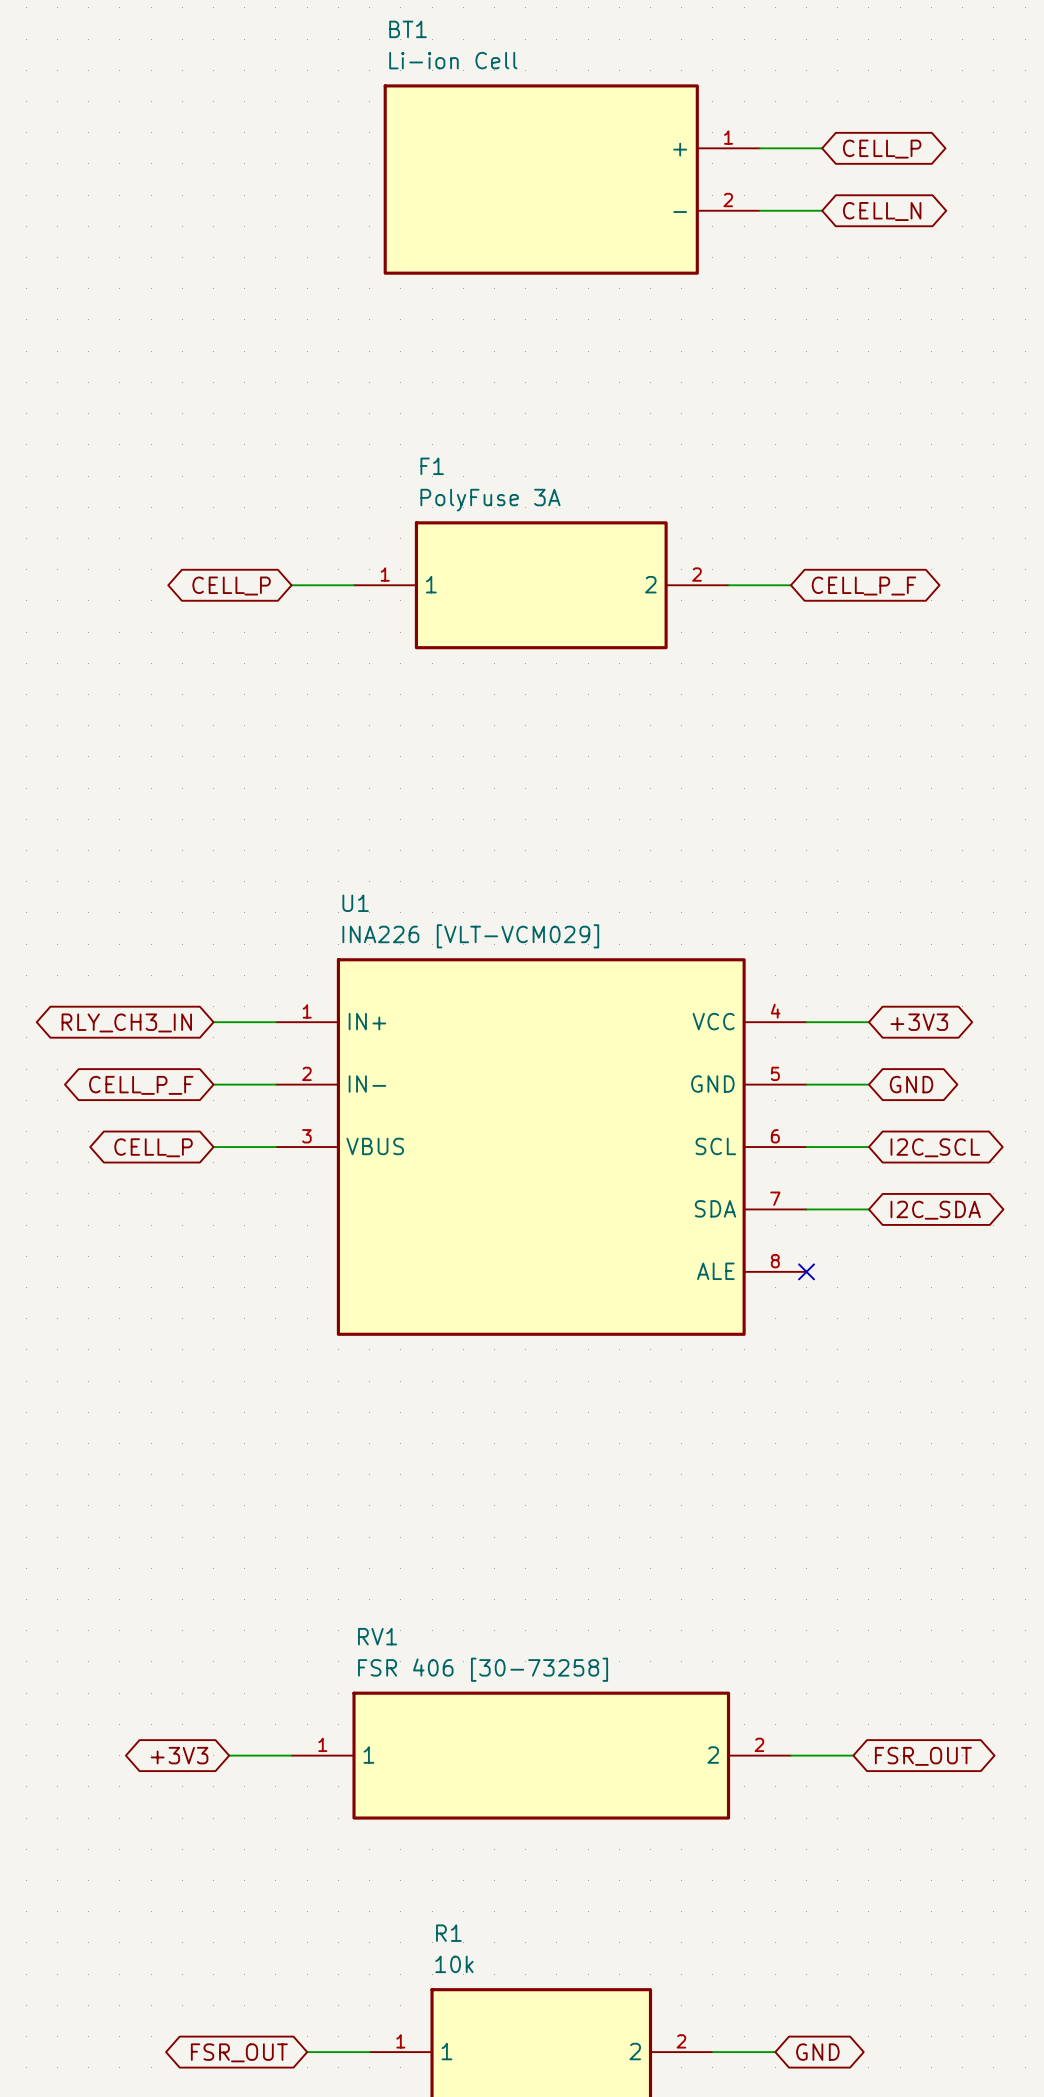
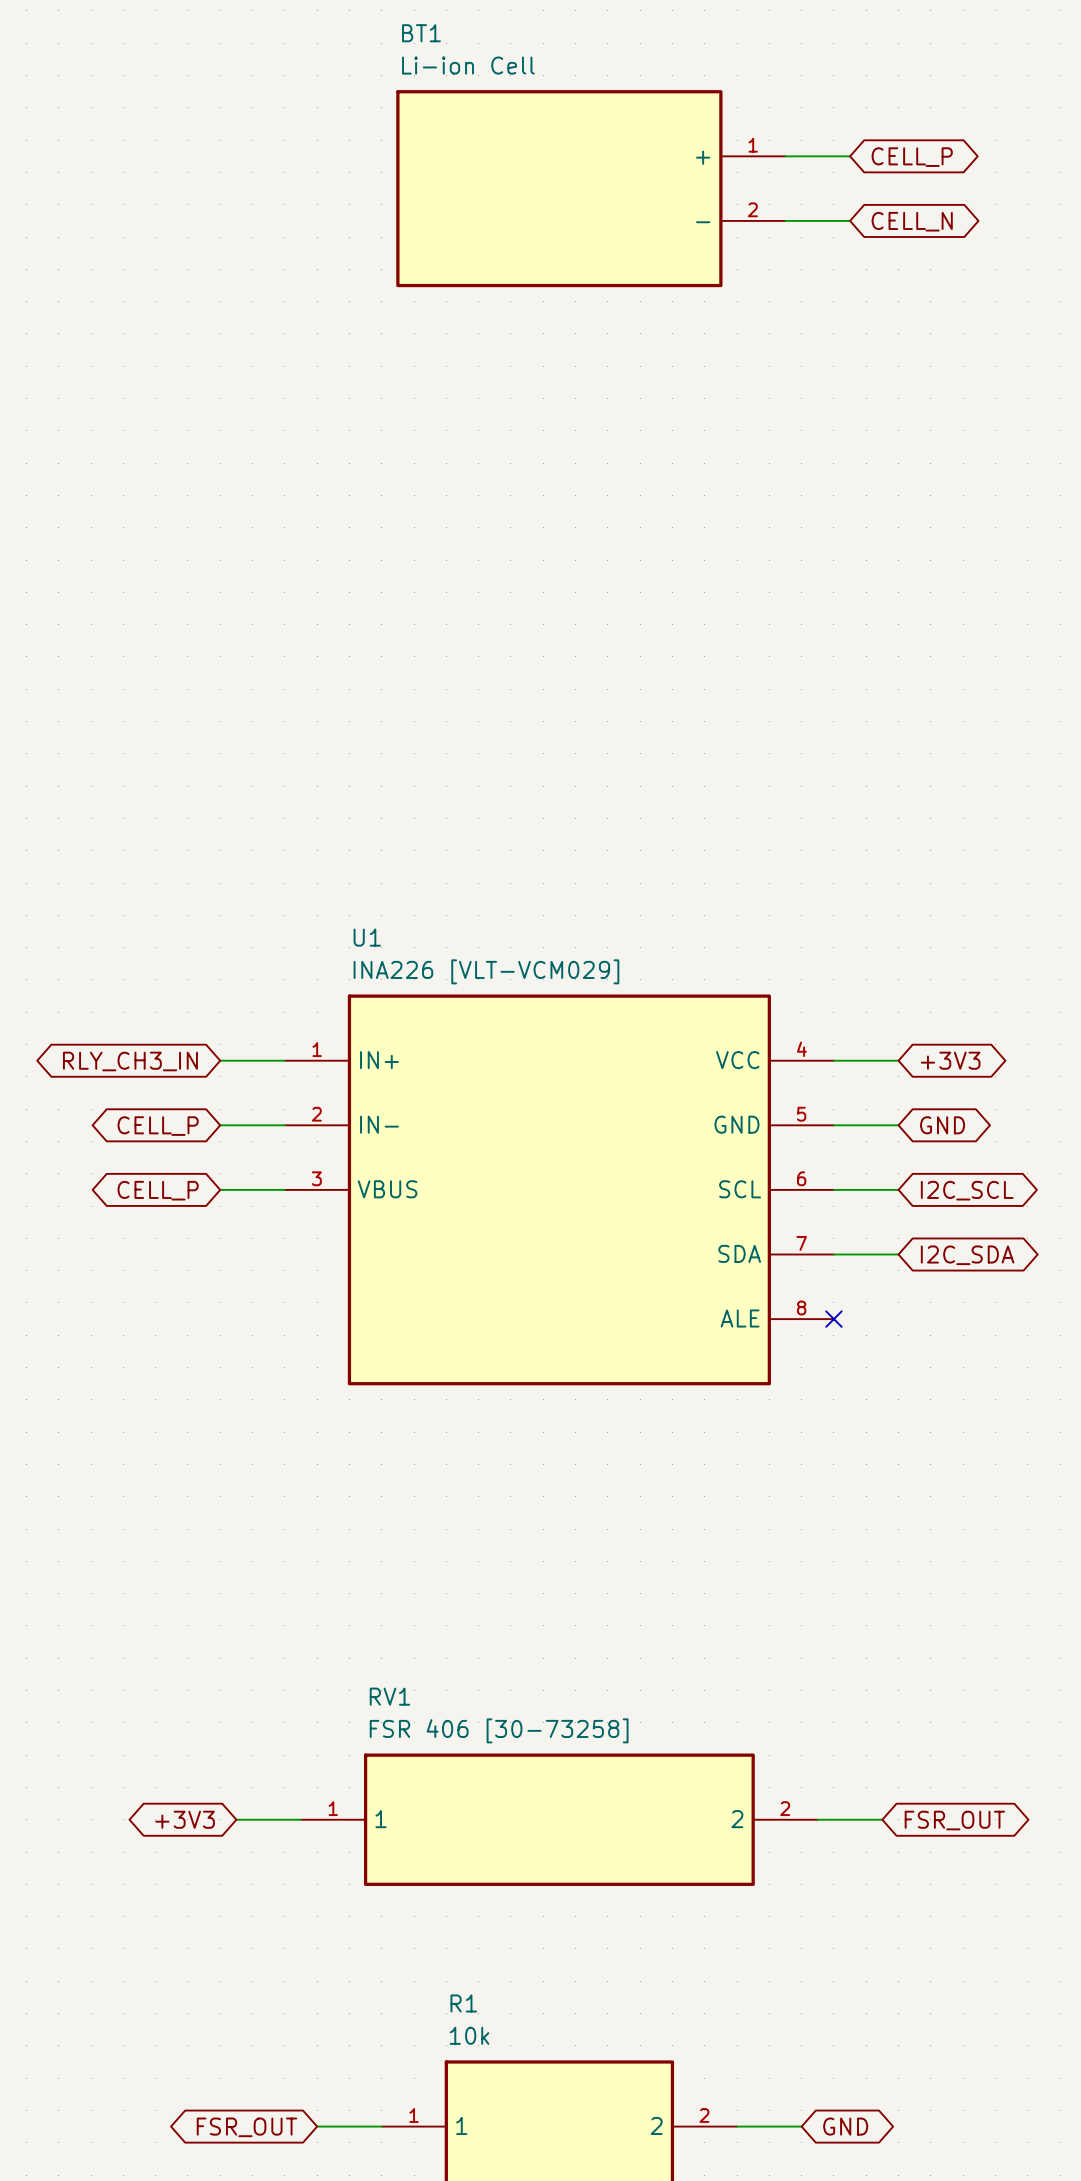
wire: (291, 585) (354, 585) -> none
F1: PolyFuse 3A (541, 585) -> none
wire: (728, 585) (790, 585) -> none
global label: CELL_P (231, 586) -> none
global label: CELL_P_F (863, 586) -> none
global label: CELL_P_F (141, 1085) -> CELL_P (158, 1126)

